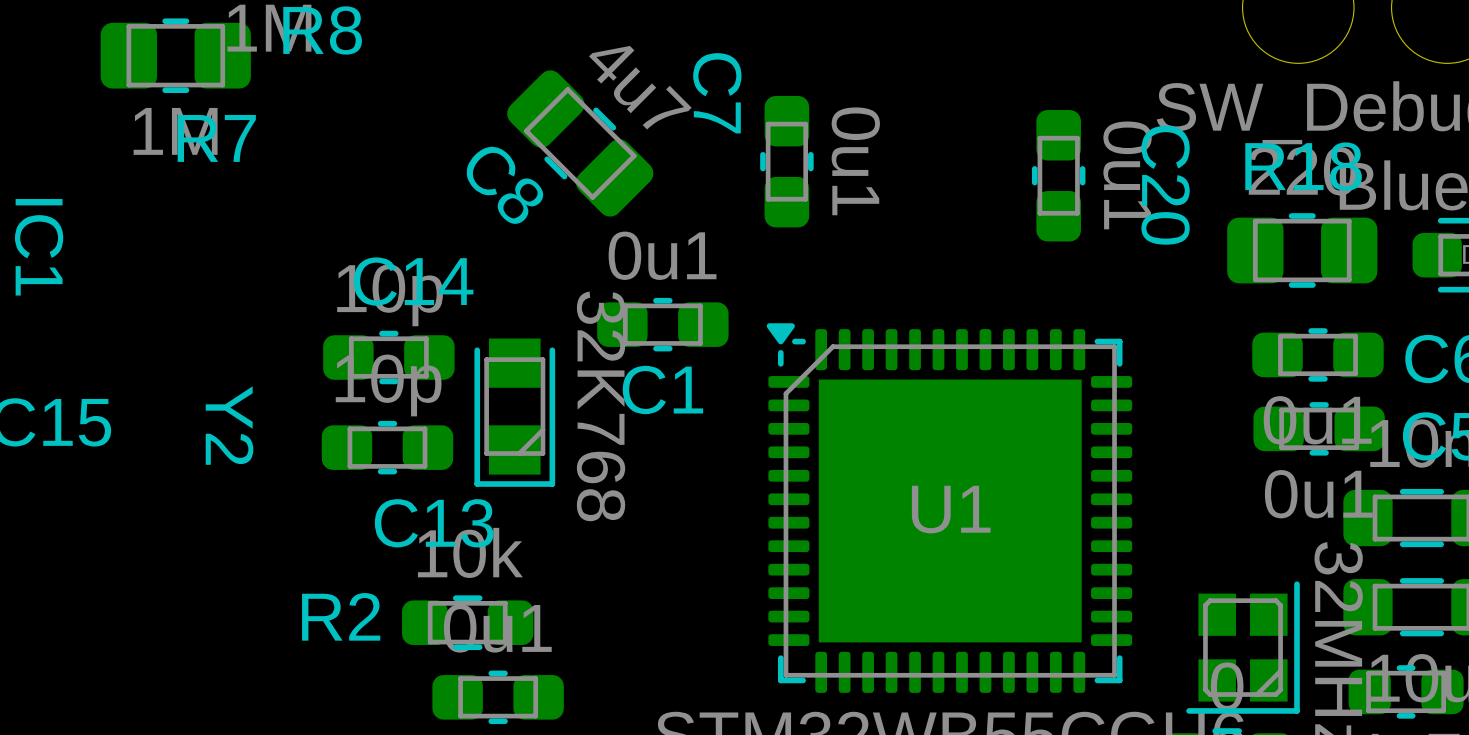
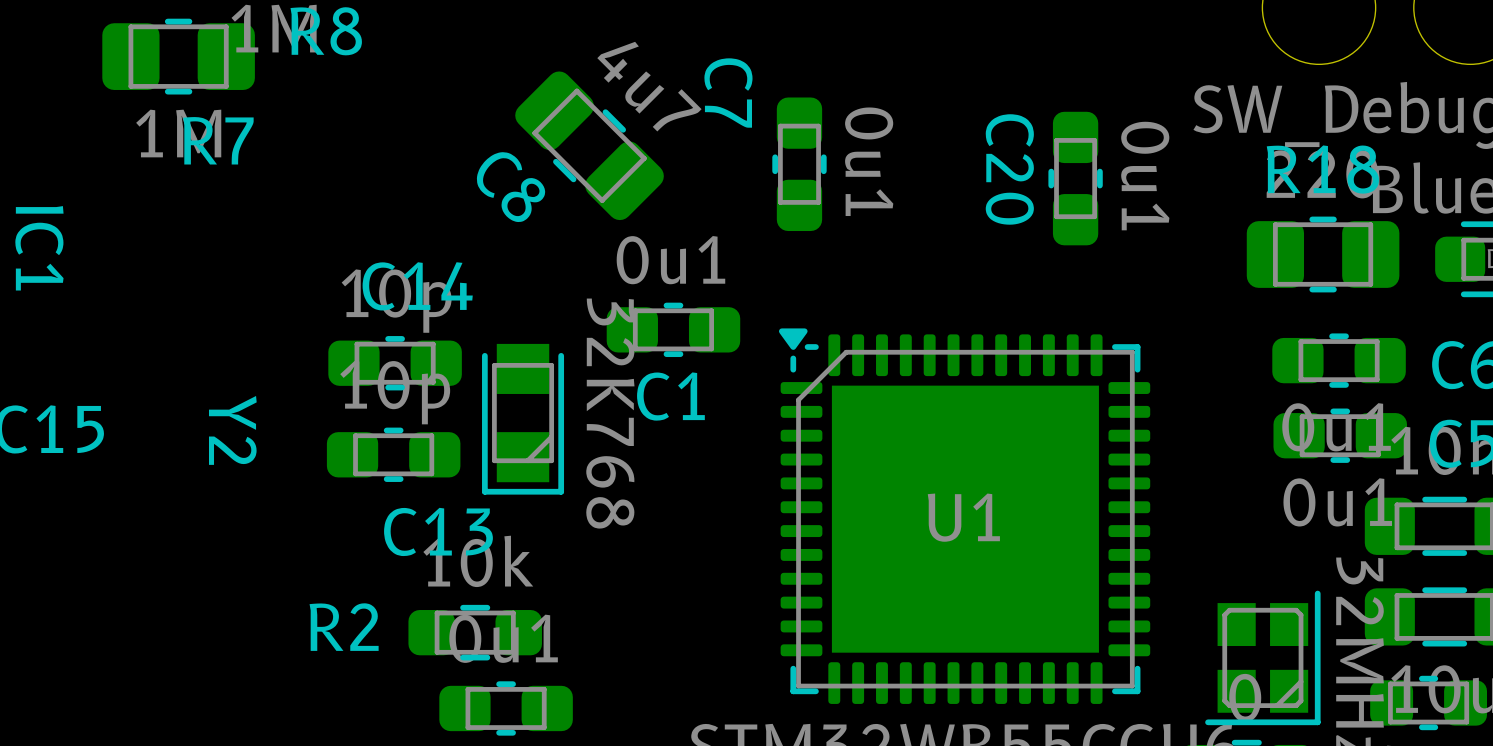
C20 name position: C20 (1165, 185) -> C20 (1009, 169)

